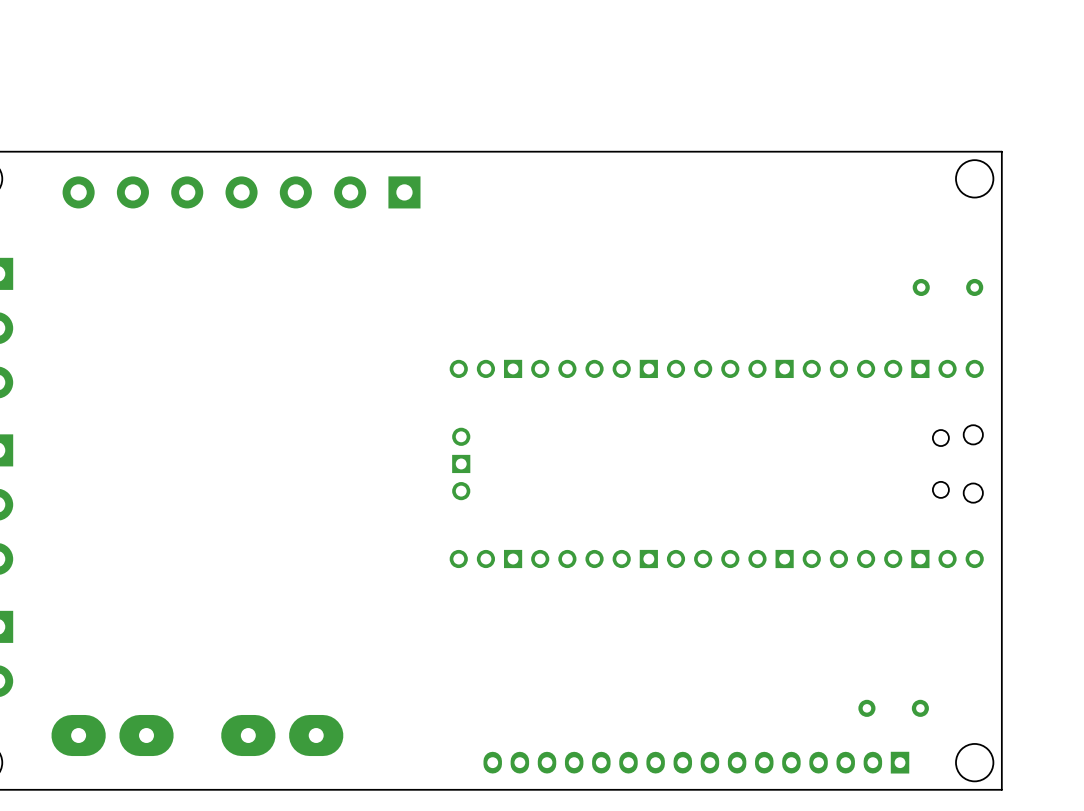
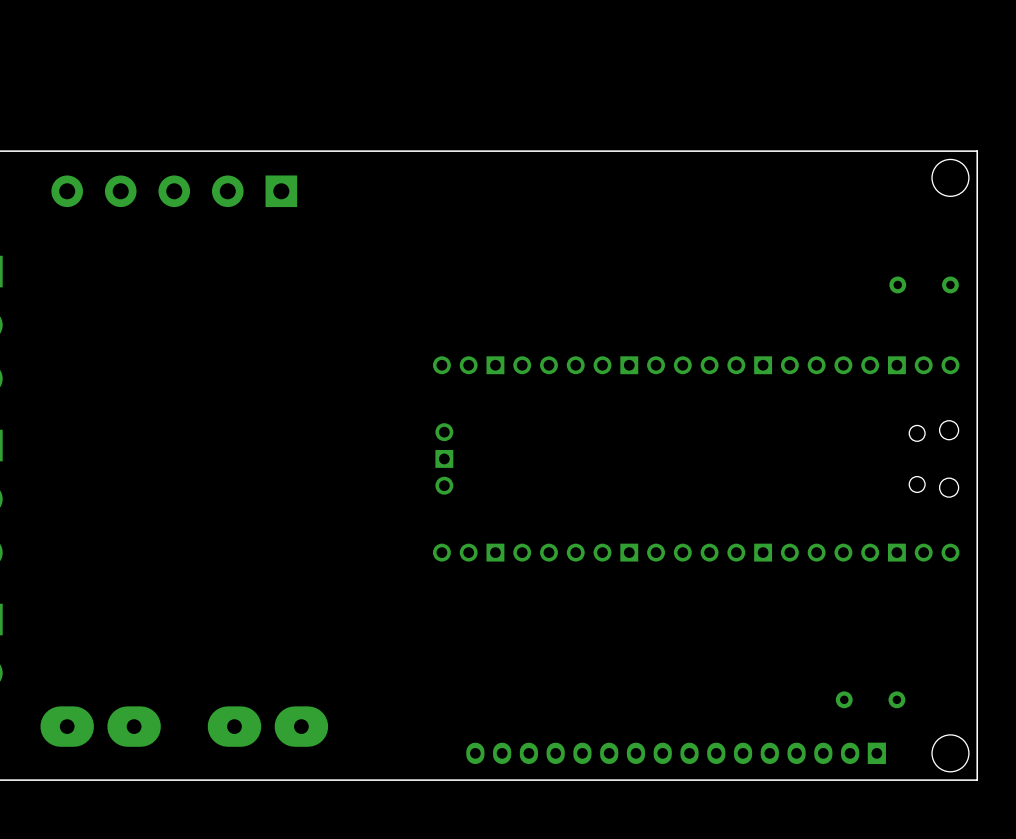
part: none -> (174, 191)
part: (241, 192) -> none

